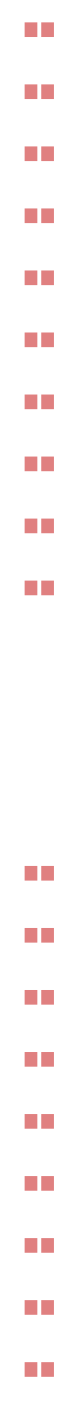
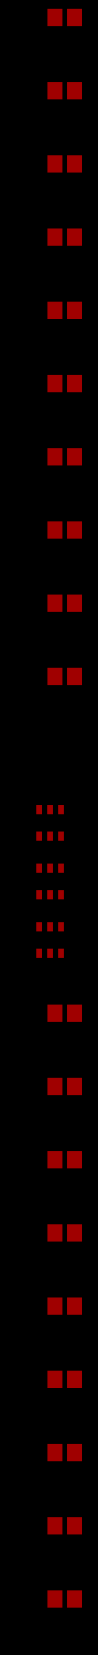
part: none -> (50, 822)
part: none -> (50, 881)
part: none -> (50, 940)

